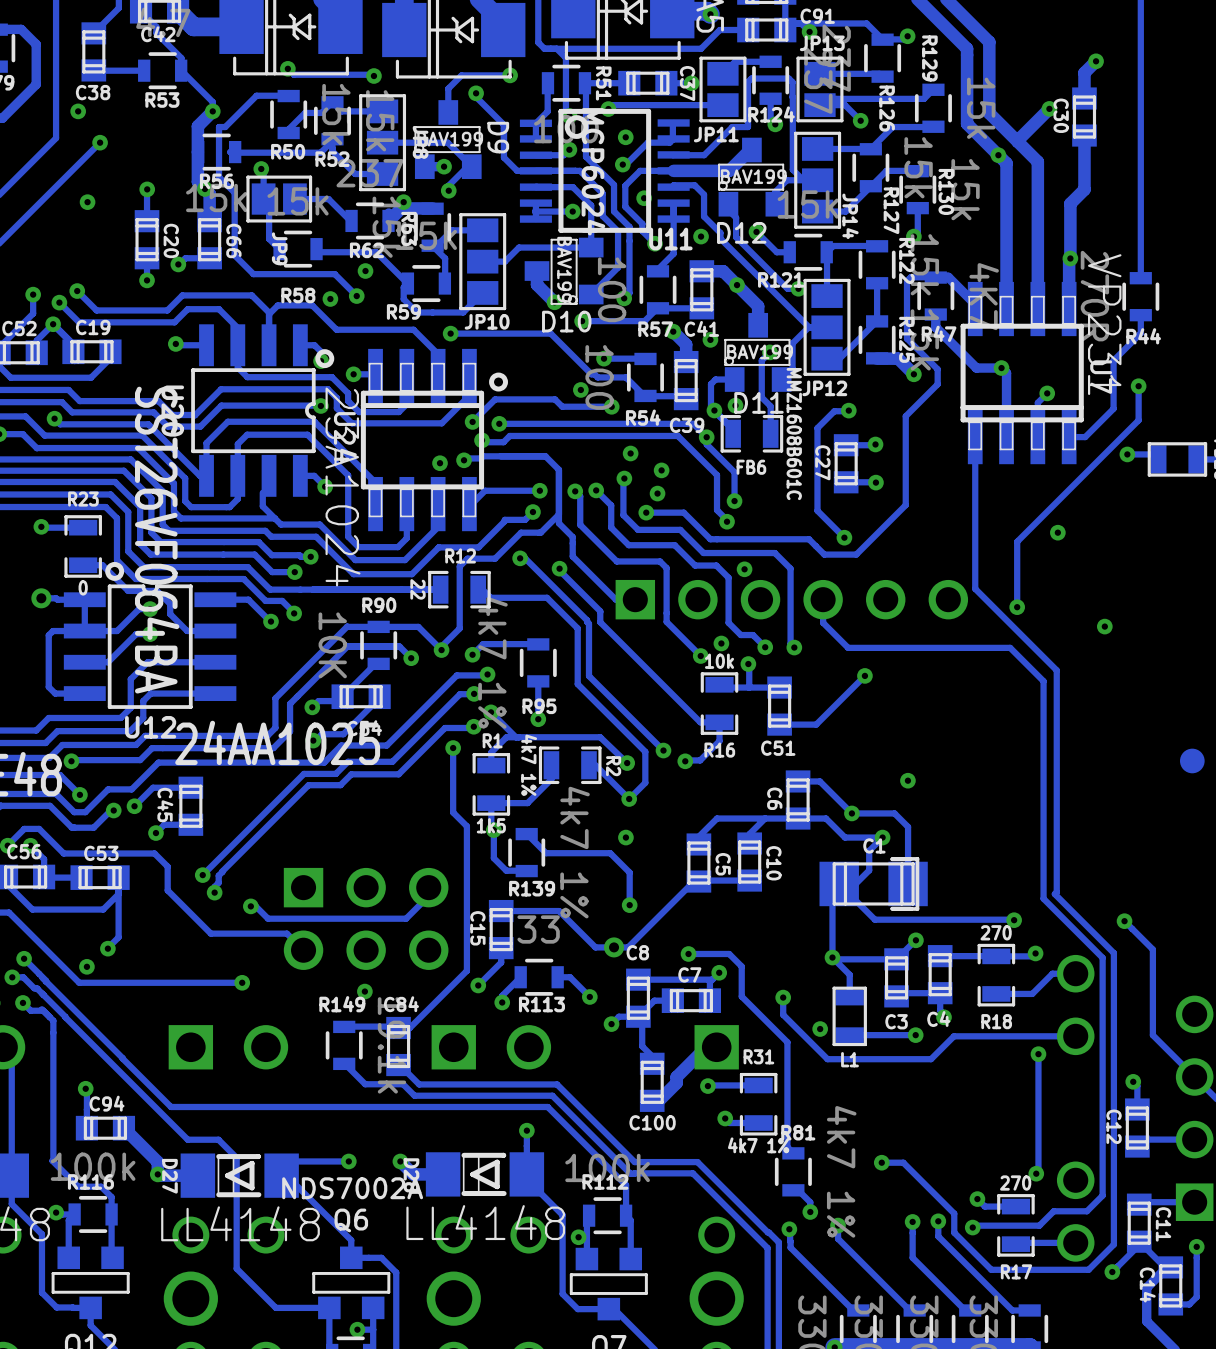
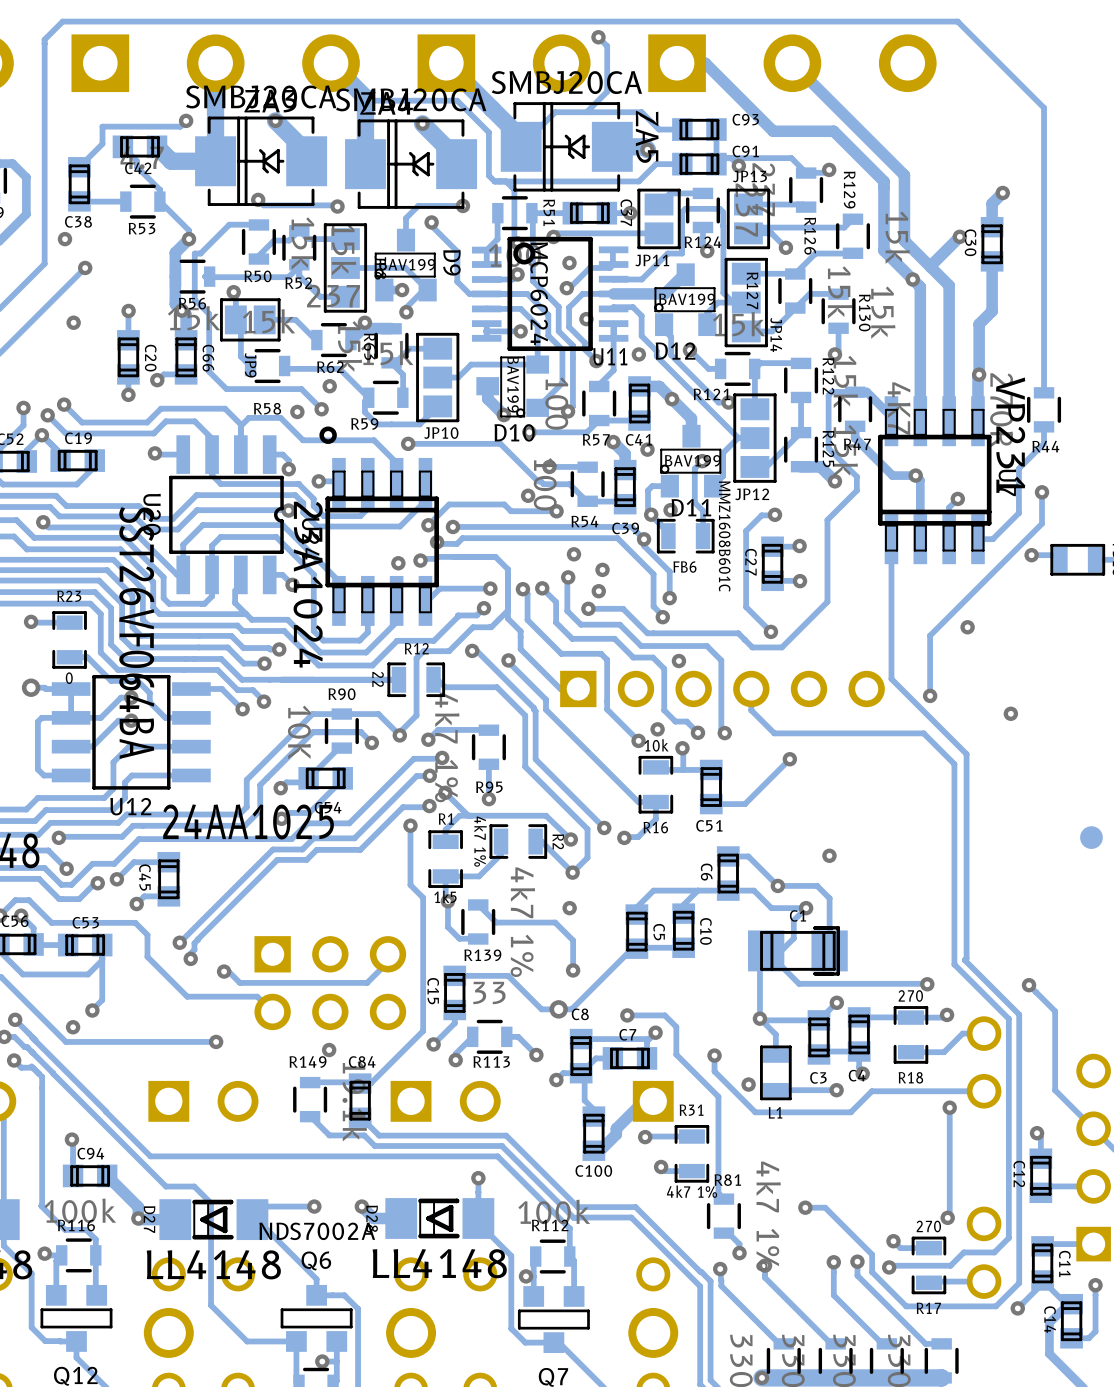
R127 name position: R127 (891, 210) -> R127 (752, 290)
drawing position: (324, 358) -> (328, 435)
drawing: [489, 372, 509, 392] -> none
drawing: [105, 561, 125, 581] -> none

